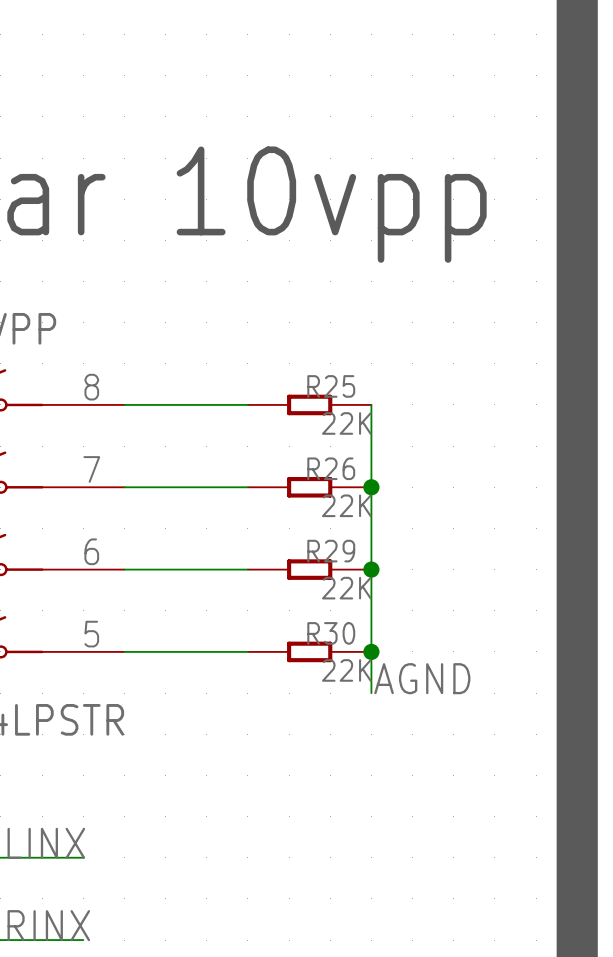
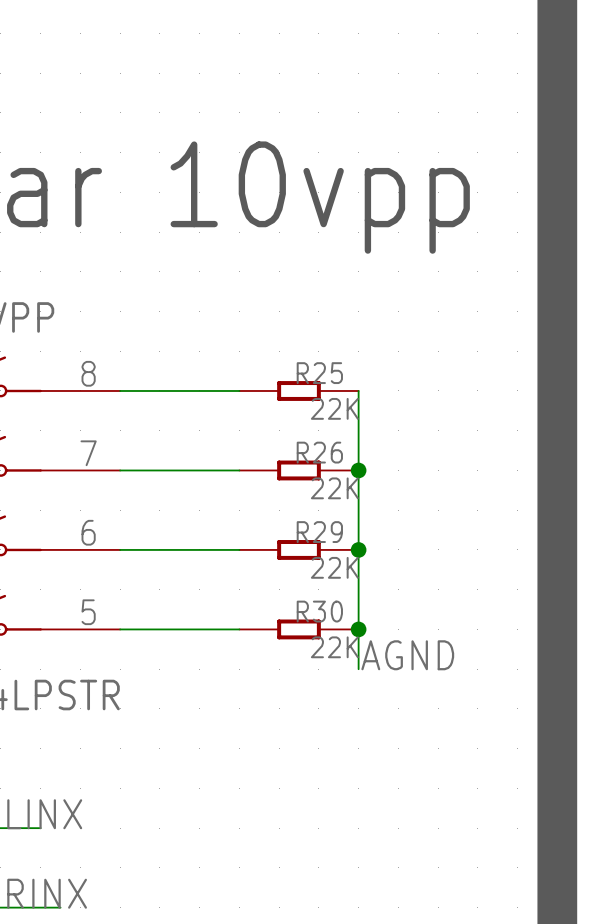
wire: (42, 857) (83, 857) -> none
wire: (62, 940) (83, 940) -> none

